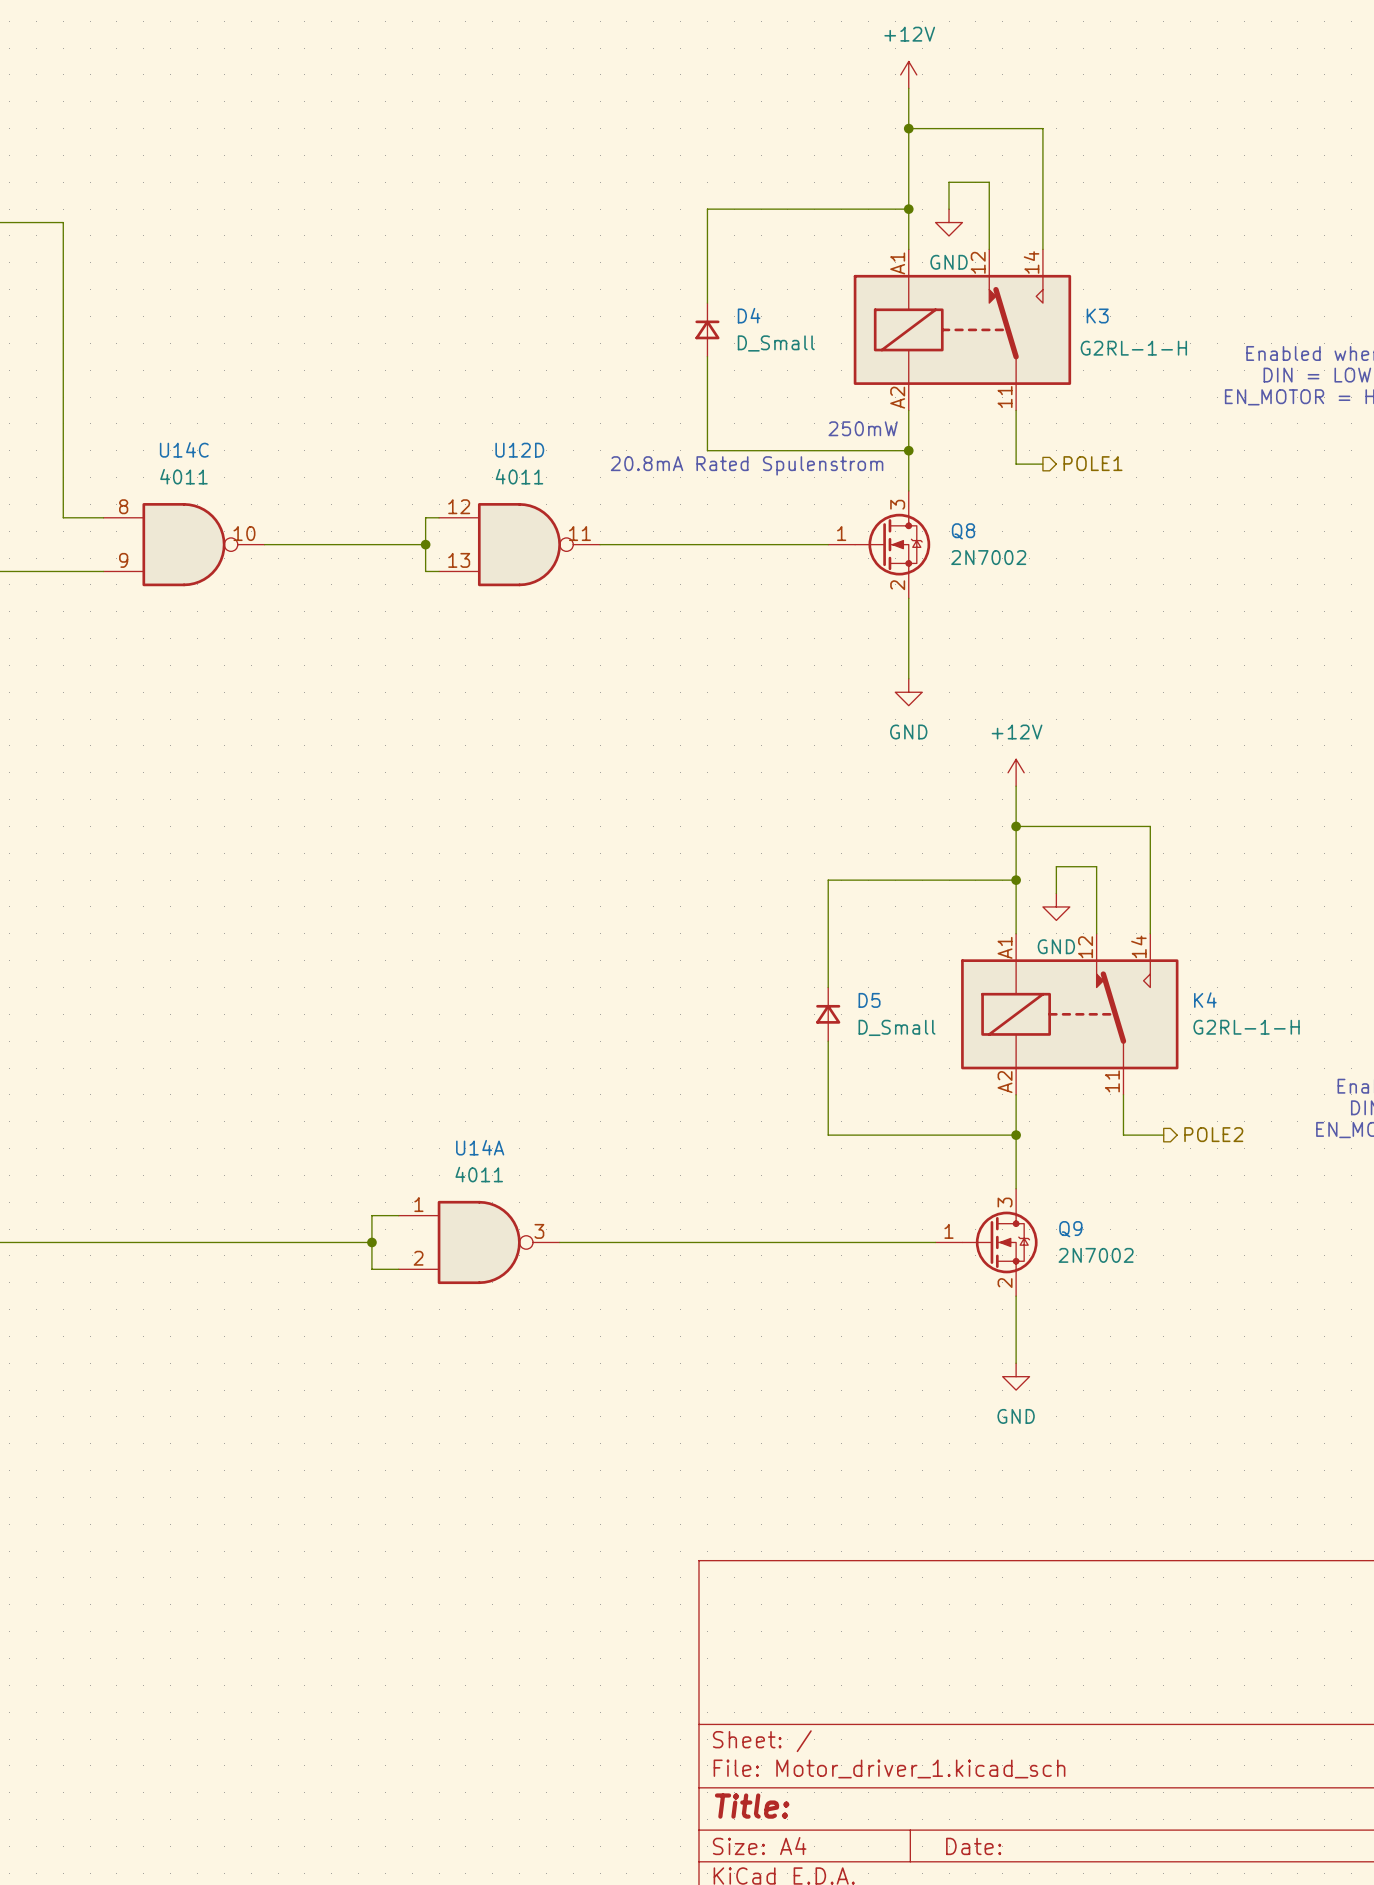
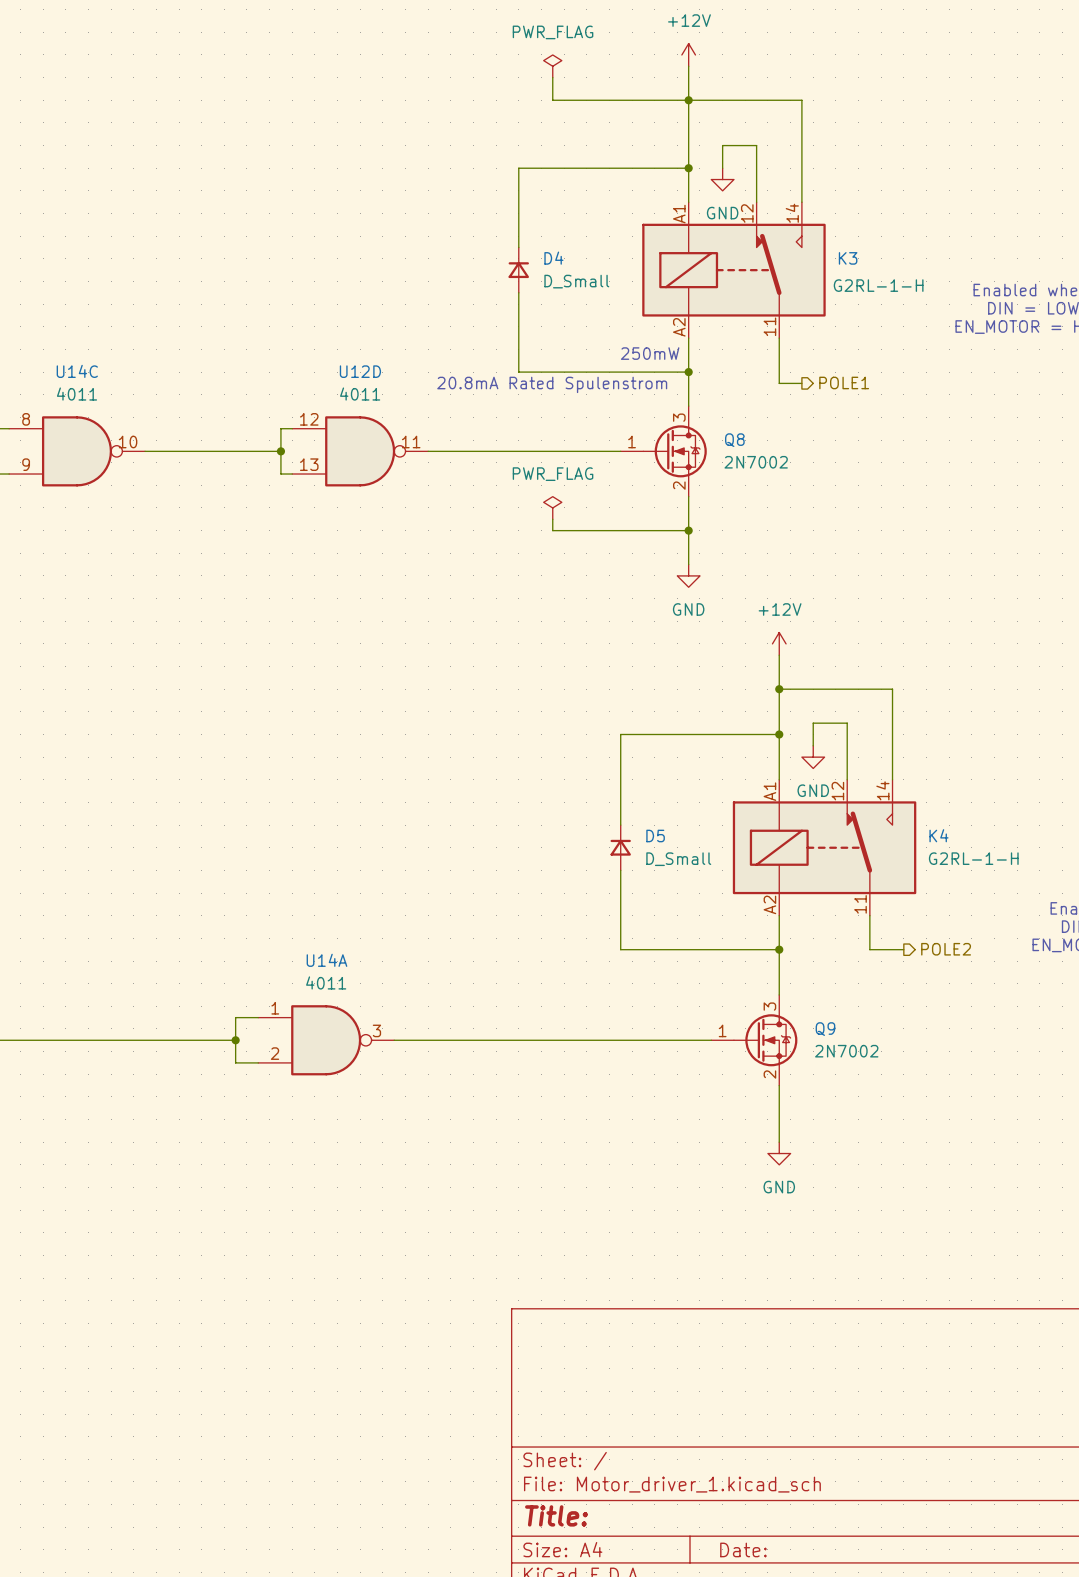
power symbol: none -> PWR_FLAG (552, 66)
wire: none -> (552, 77) (552, 100) (688, 100)
power symbol: none -> PWR_FLAG (552, 507)
wire: none -> (552, 519) (552, 530) (688, 530)
junction: none -> (688, 530)

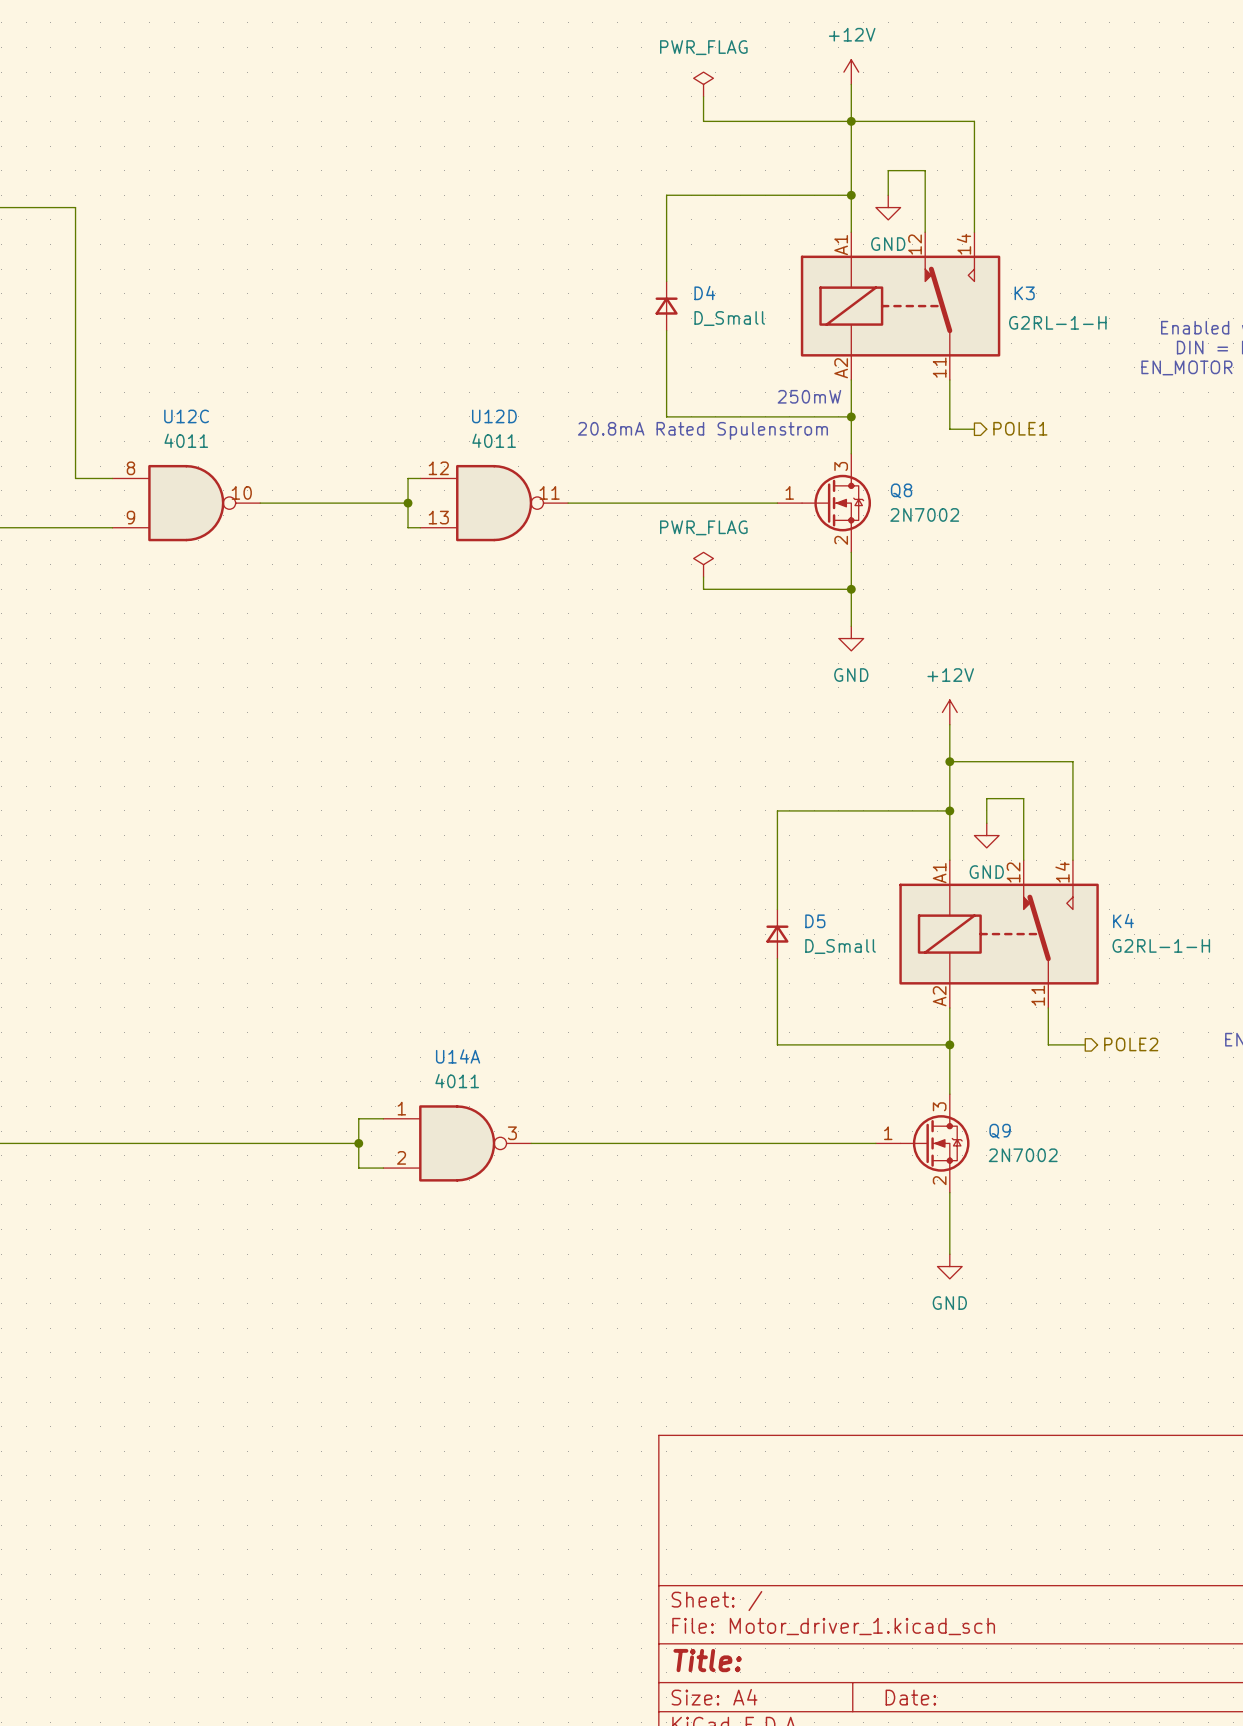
U14C name: U14C (77, 371) -> U12C (186, 416)

